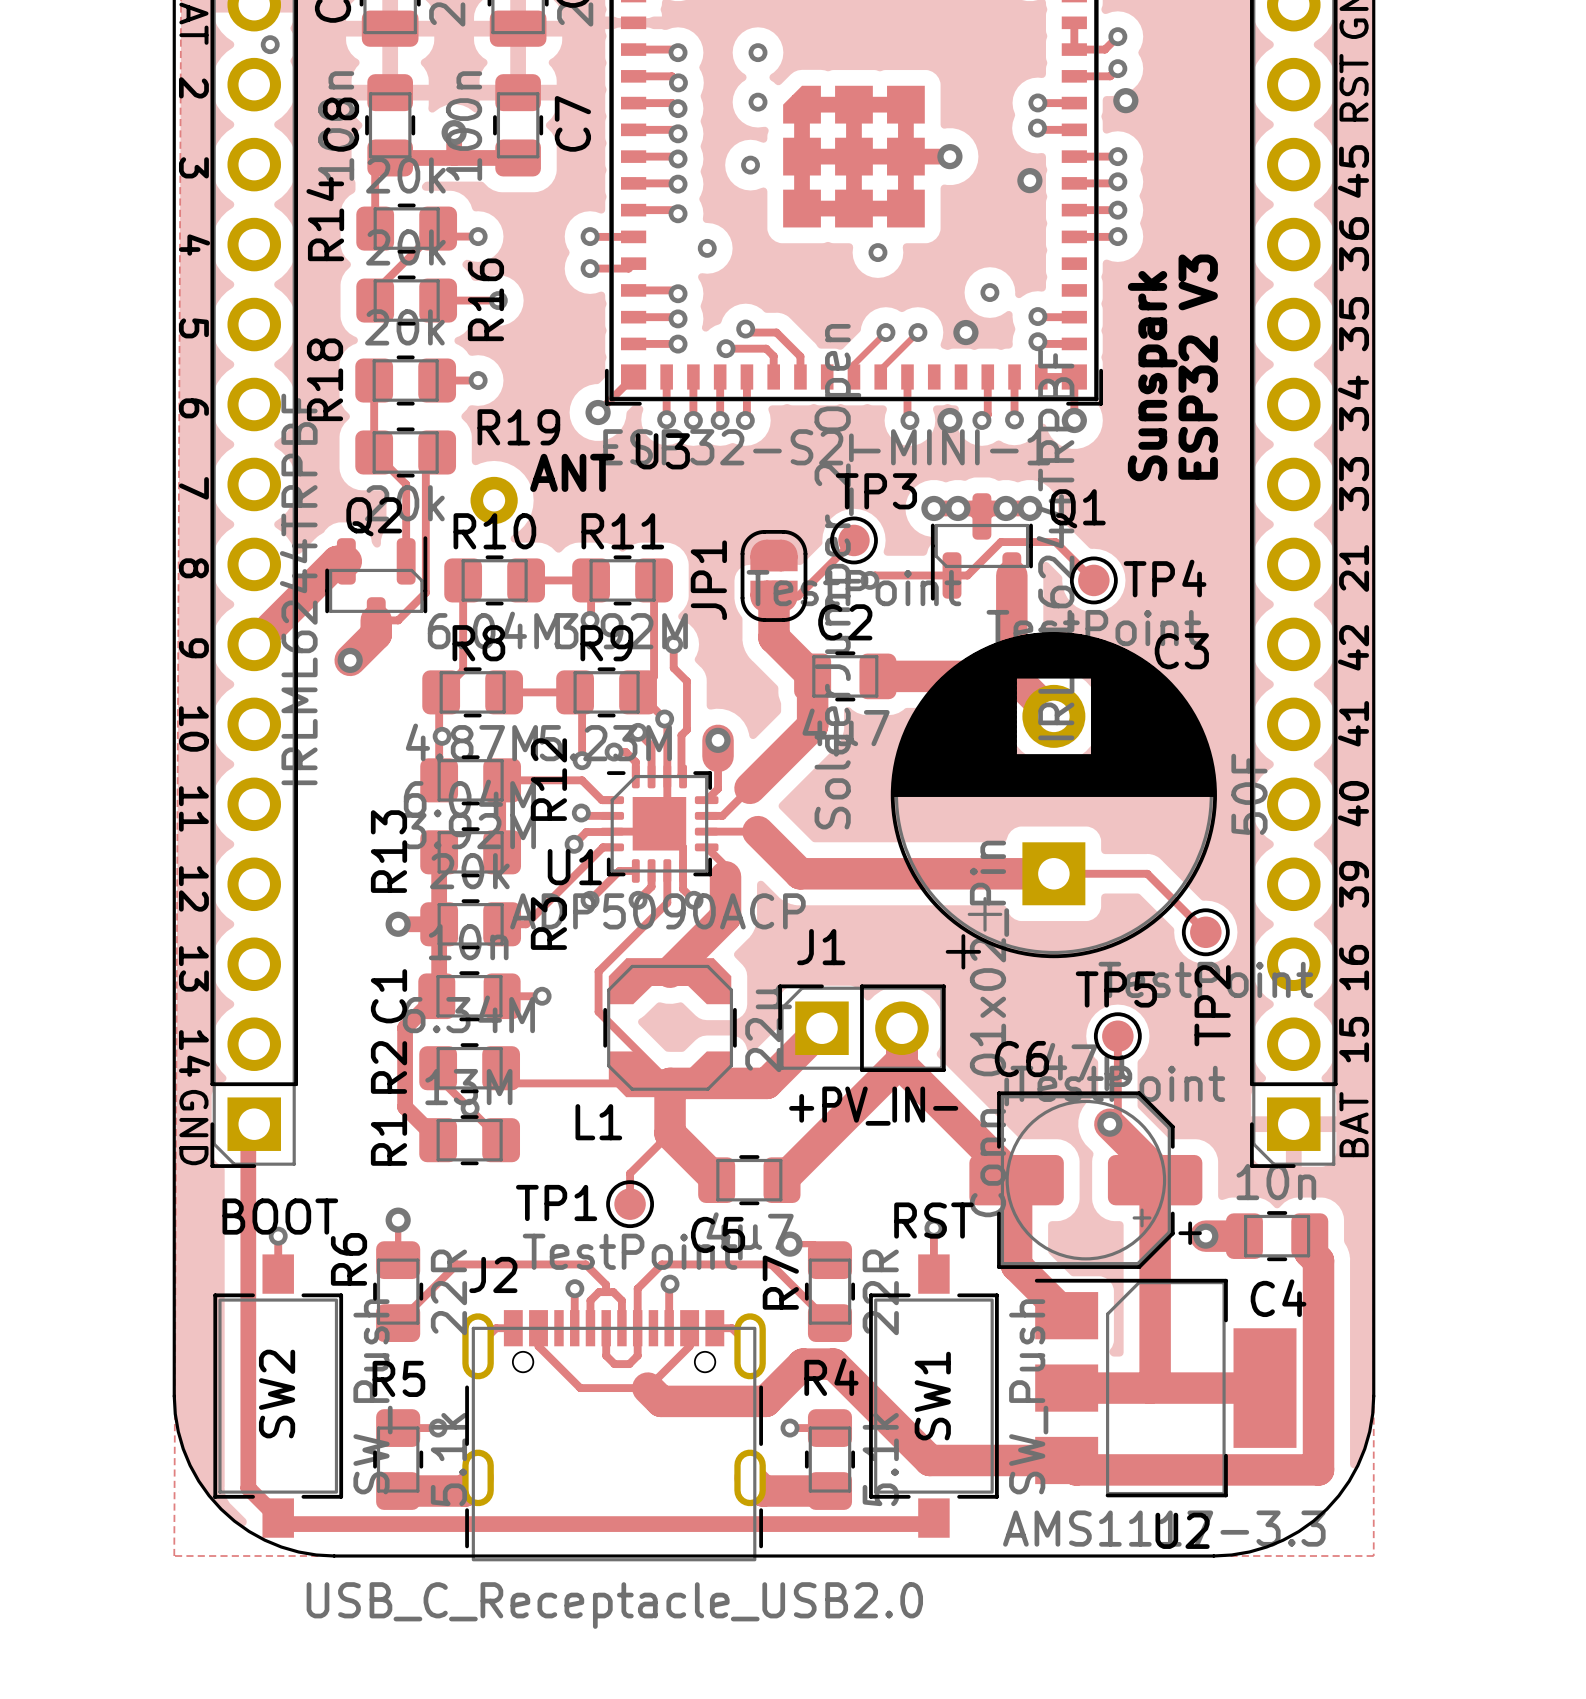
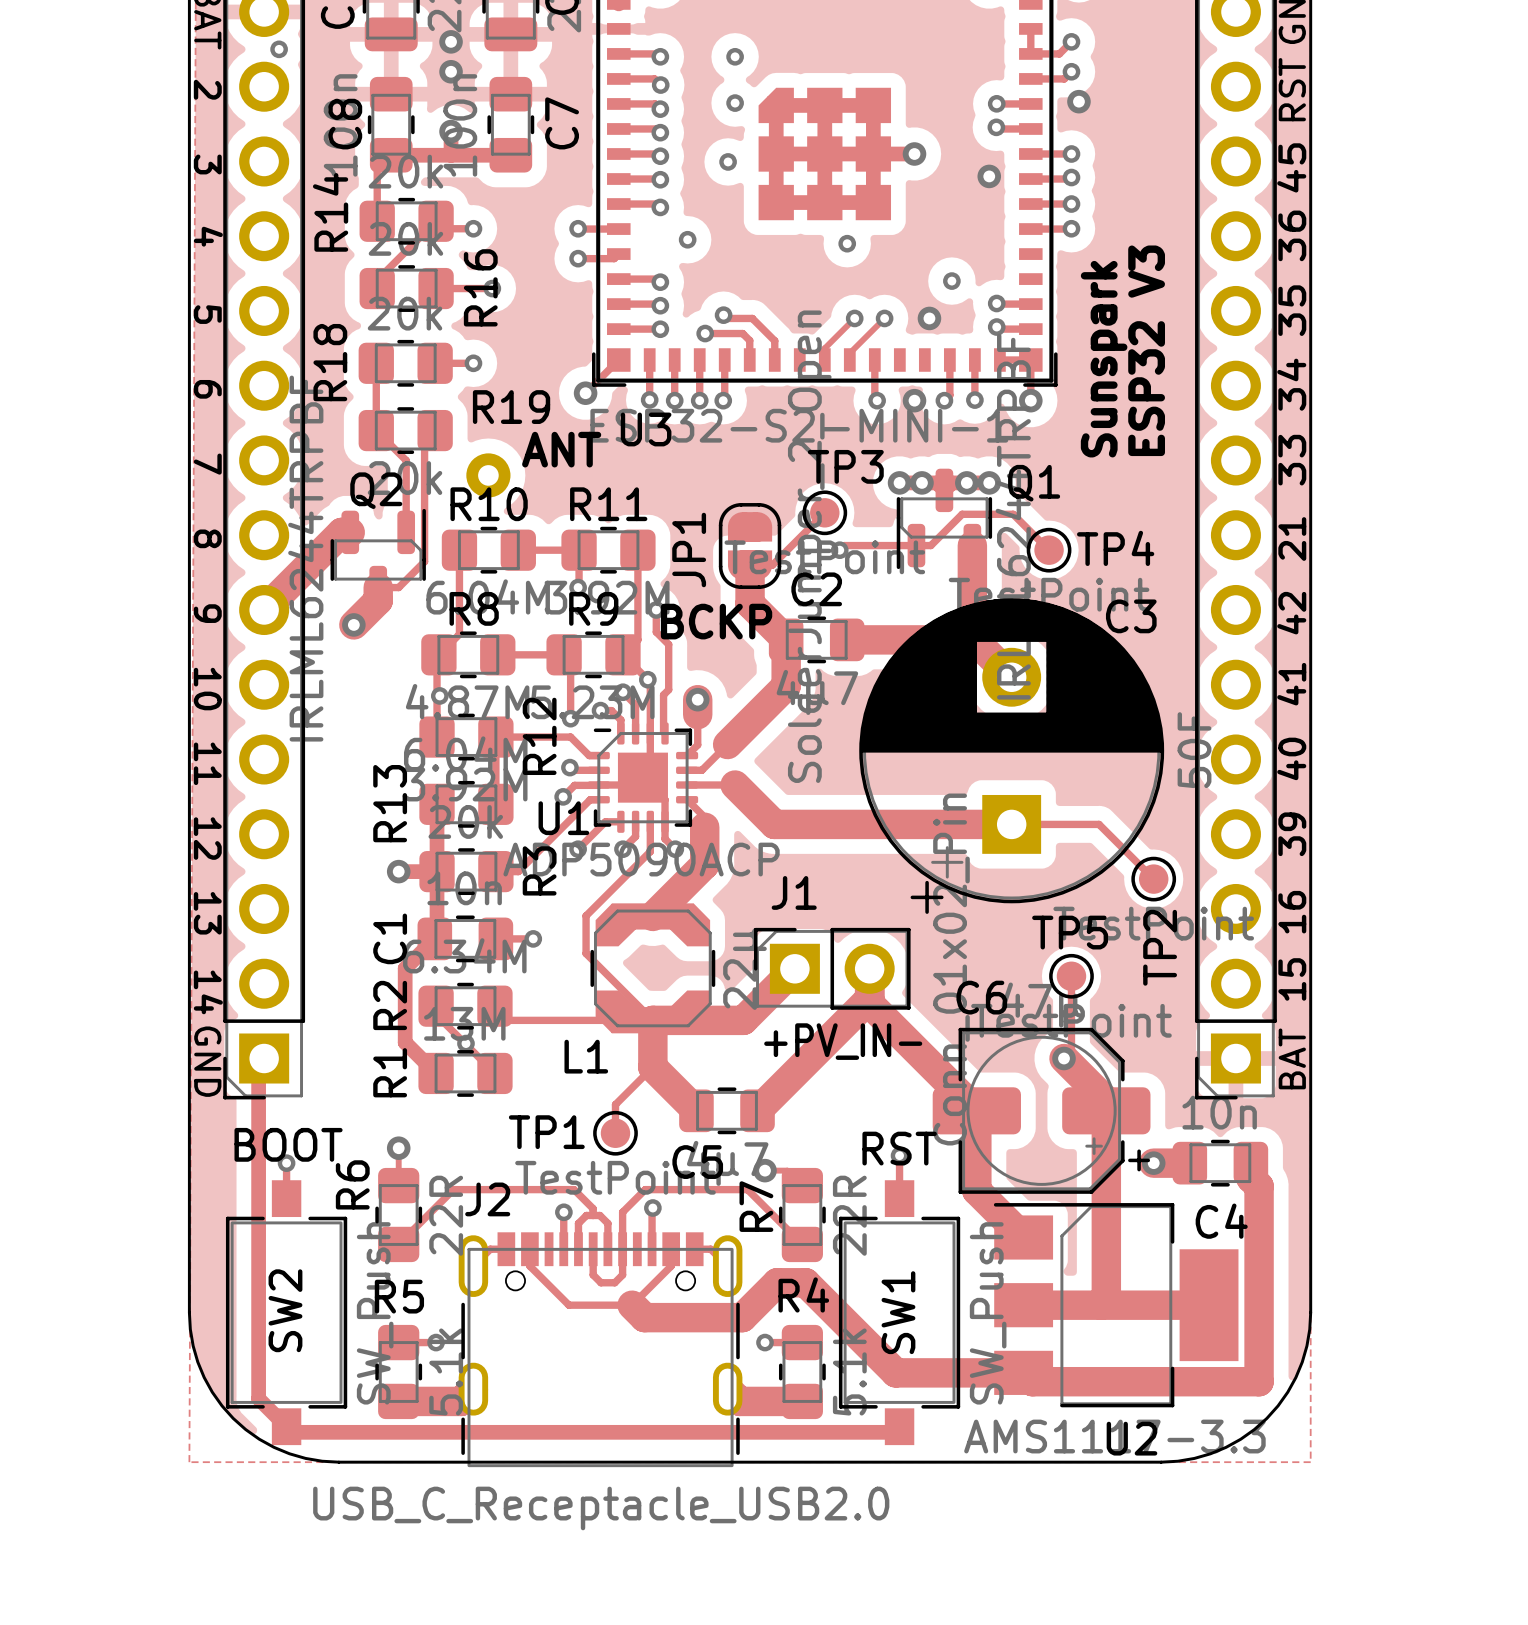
via: none -> (451, 41)
via: none -> (451, 71)
text: none -> BCKP (716, 621)

